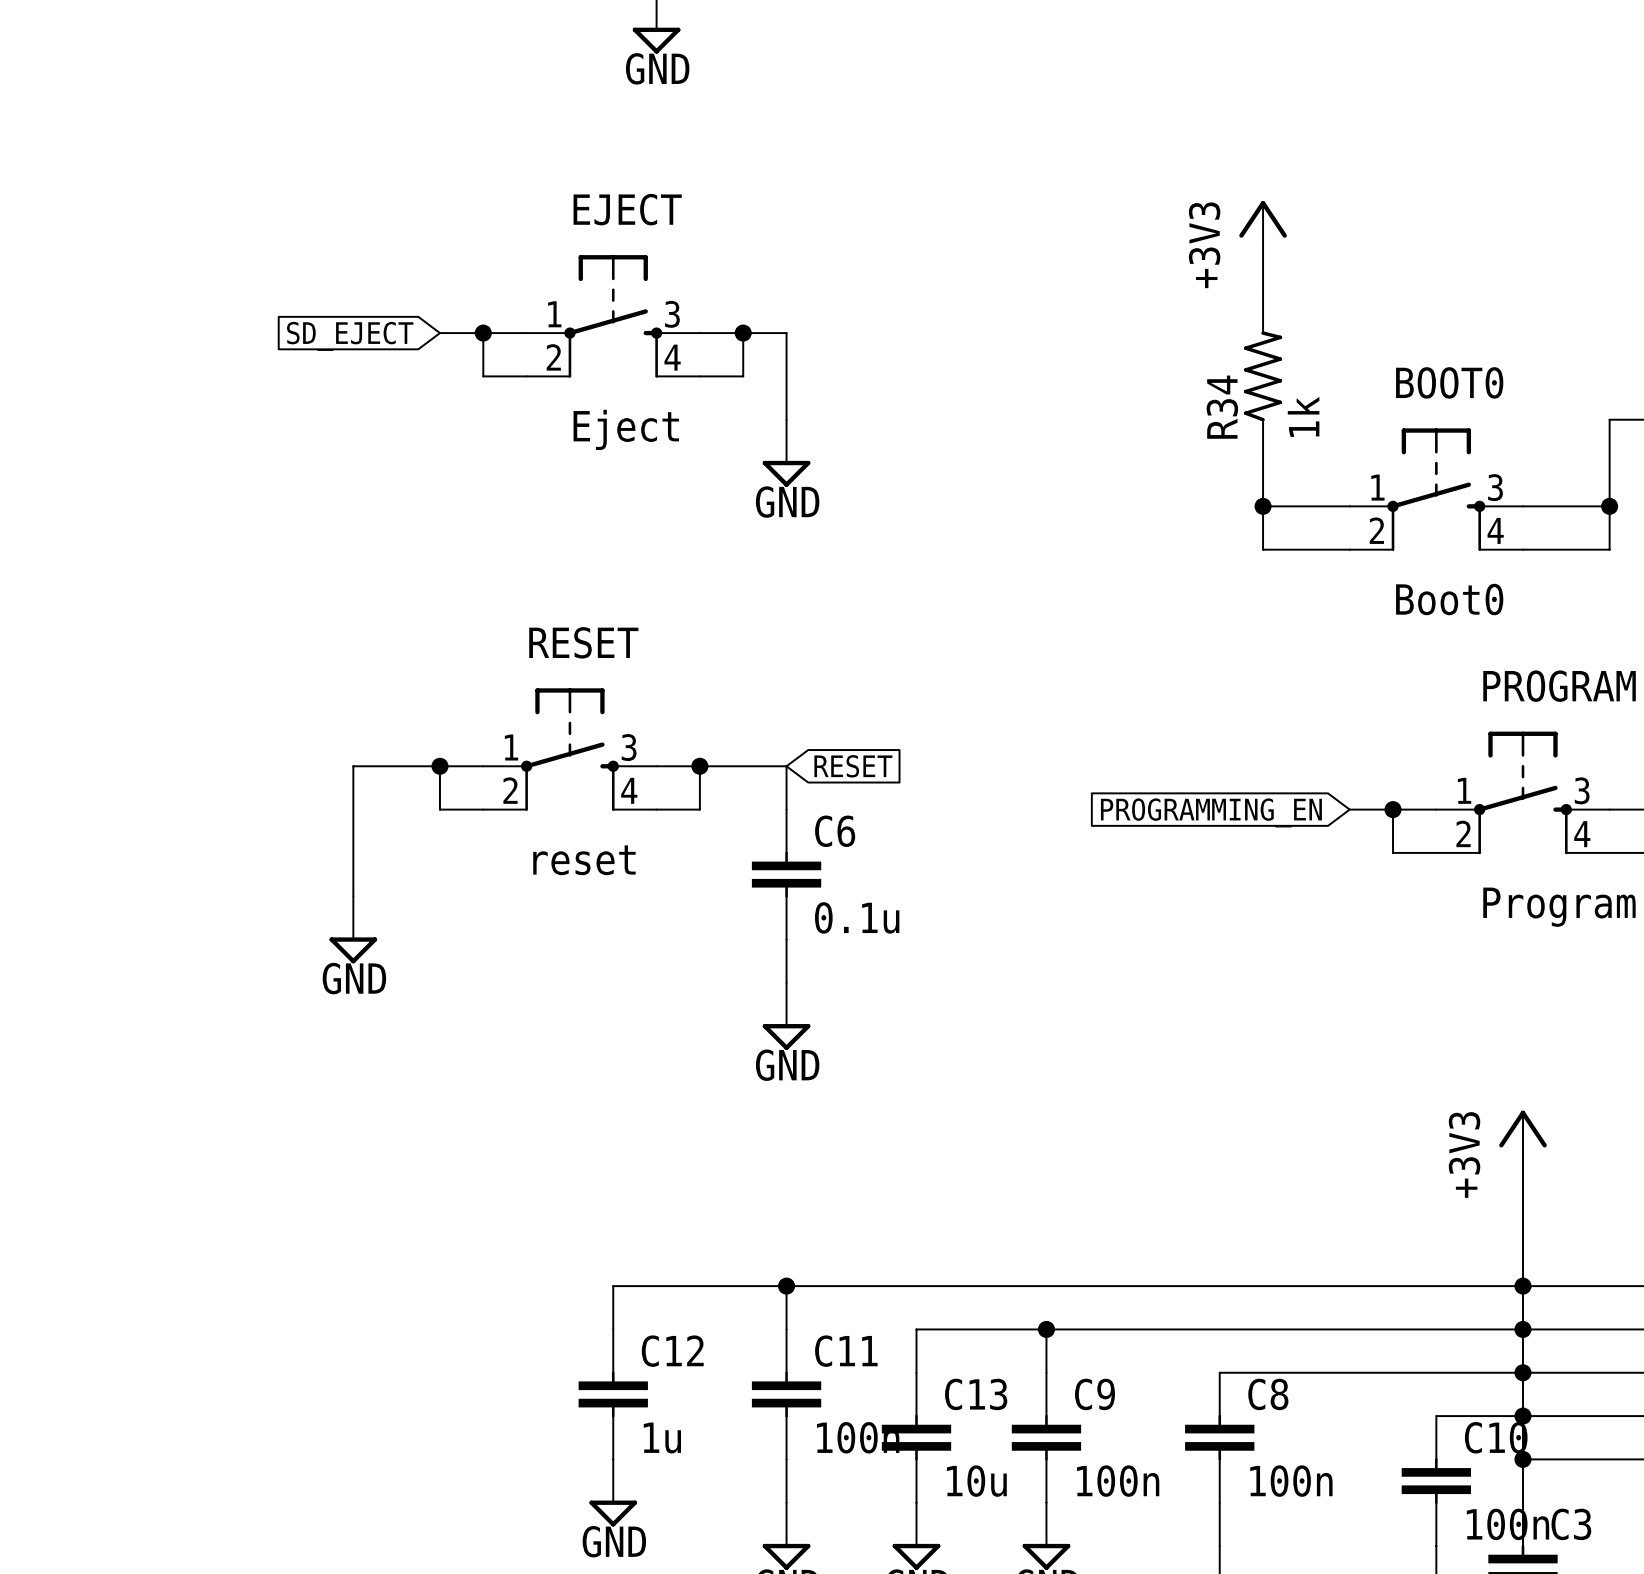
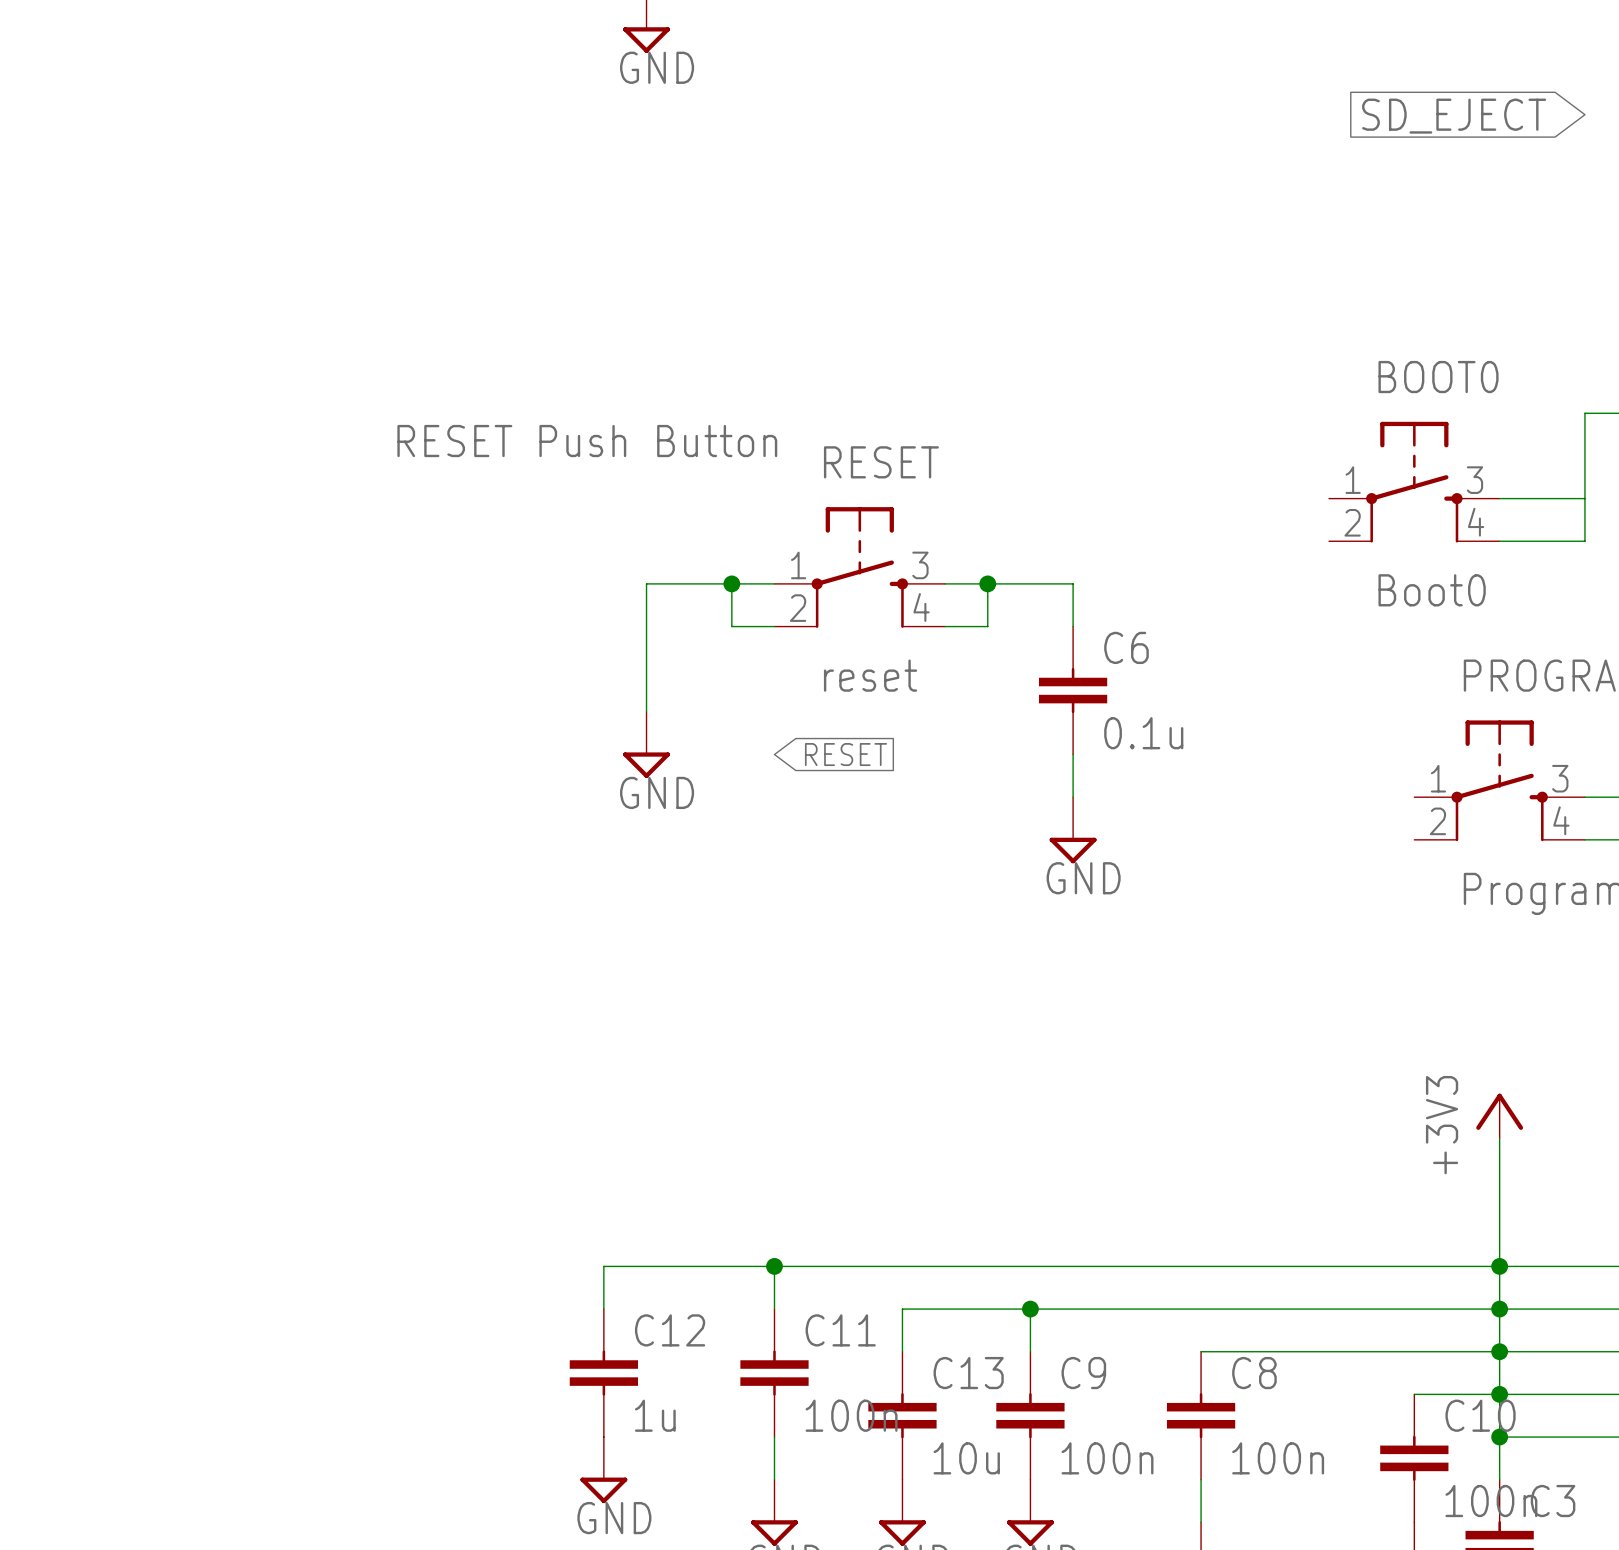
global label: none -> SD_EJECT (1454, 116)
power symbol: +3V3 (1263, 223) -> none
wire: (1263, 246) (1263, 289) -> none
EJECT: Eject (613, 316) -> none
wire: (439, 333) (526, 333) -> none
wire: (483, 333) (483, 376) (526, 376) -> none
junction: (483, 333) -> none
wire: (699, 333) (786, 333) (786, 419) -> none
wire: (743, 333) (743, 376) (699, 376) -> none
junction: (743, 333) -> none
global label: SD_EJECT (350, 336) -> none
R34: 1k (1263, 376) -> none
text: none -> RESET Push Button (587, 441)
power symbol: GND (786, 453) -> none
wire: (1263, 463) (1263, 549) (1349, 549) -> none
wire: (1263, 506) (1349, 506) -> none
junction: (1263, 506) -> none
junction: (1609, 506) -> none
junction: none -> (731, 583)
junction: none -> (987, 583)
RESET position: (569, 749) -> (859, 567)
power symbol: none -> GND (646, 744)
wire: (439, 766) (439, 809) (483, 809) -> (731, 583) (731, 626) (774, 626)
junction: (439, 766) -> none
wire: (483, 766) (353, 766) (353, 896) -> (774, 583) (646, 583) (646, 711)
wire: (656, 766) (786, 766) (786, 809) -> (945, 583) (1073, 583) (1073, 626)
wire: (699, 766) (699, 809) (656, 809) -> (987, 583) (987, 626) (945, 626)
junction: (699, 766) -> none
wire: (1349, 809) (1436, 809) -> none
wire: (1393, 809) (1393, 852) (1436, 852) -> none
junction: (1393, 809) -> none
global label: PROGRAMMING_EN (1211, 812) -> none
power symbol: none -> GND (1073, 830)
C6 position: (786, 874) -> (1073, 690)
power symbol: GND (353, 929) -> none
wire: (786, 939) (786, 982) -> (1073, 754) (1073, 797)
power symbol: GND (786, 1016) -> none

